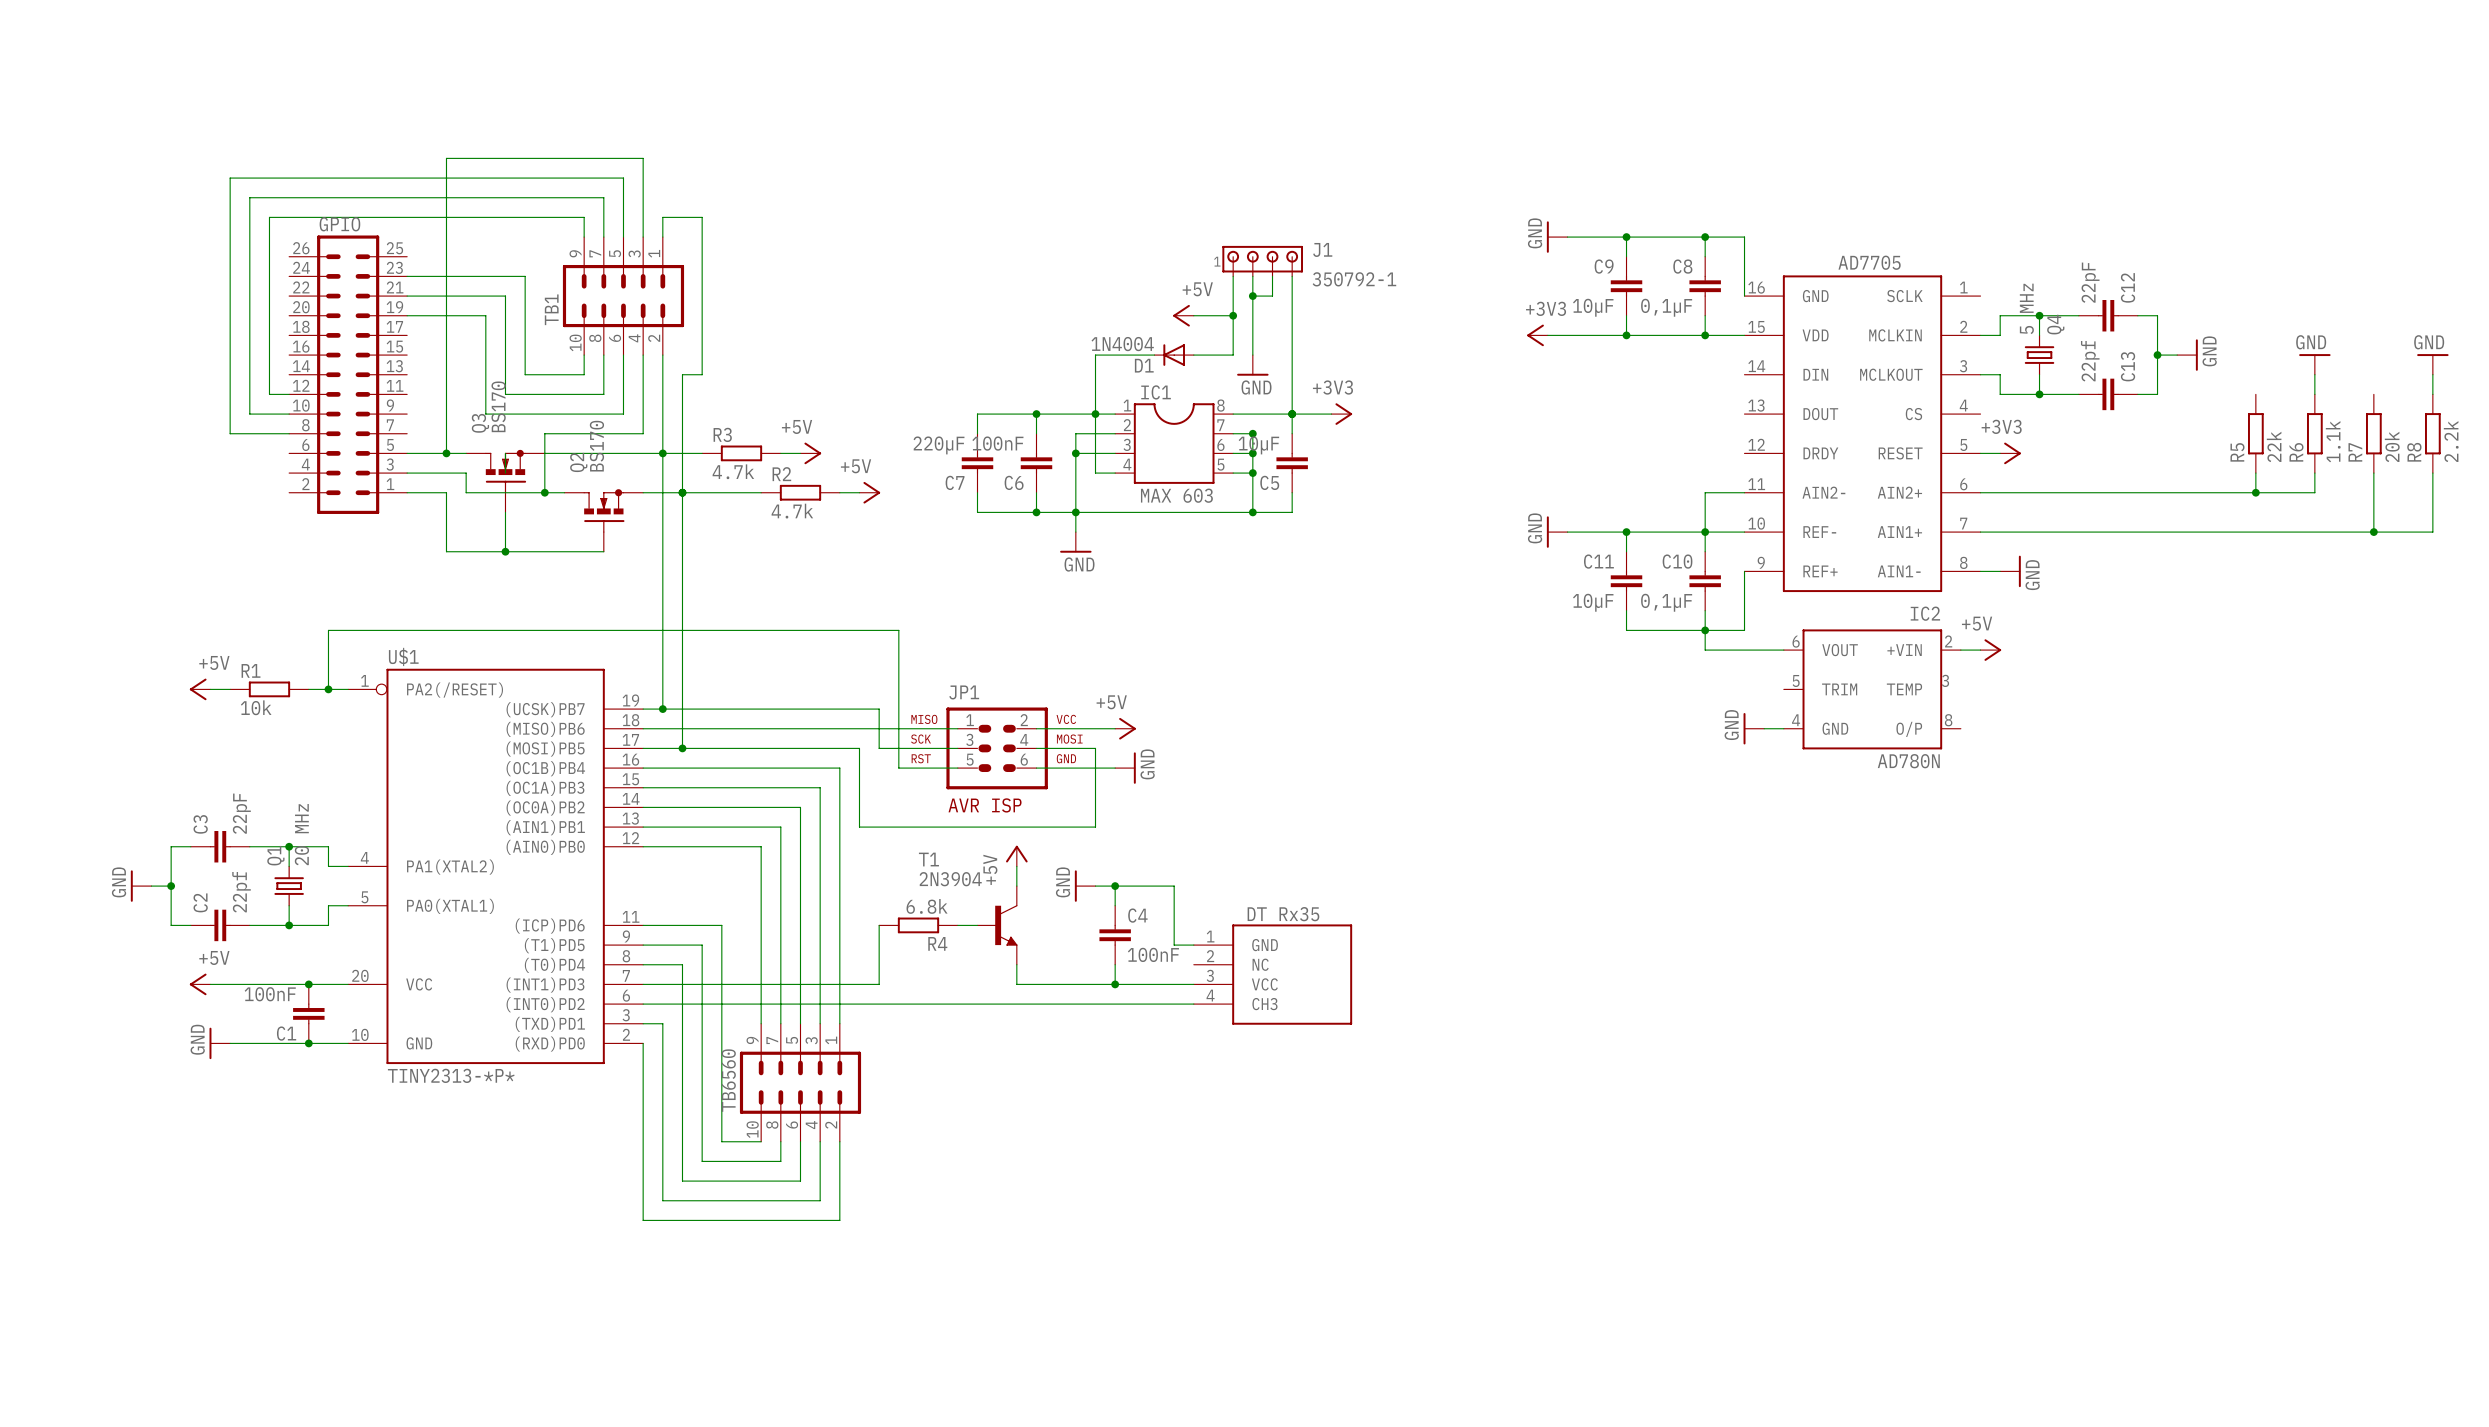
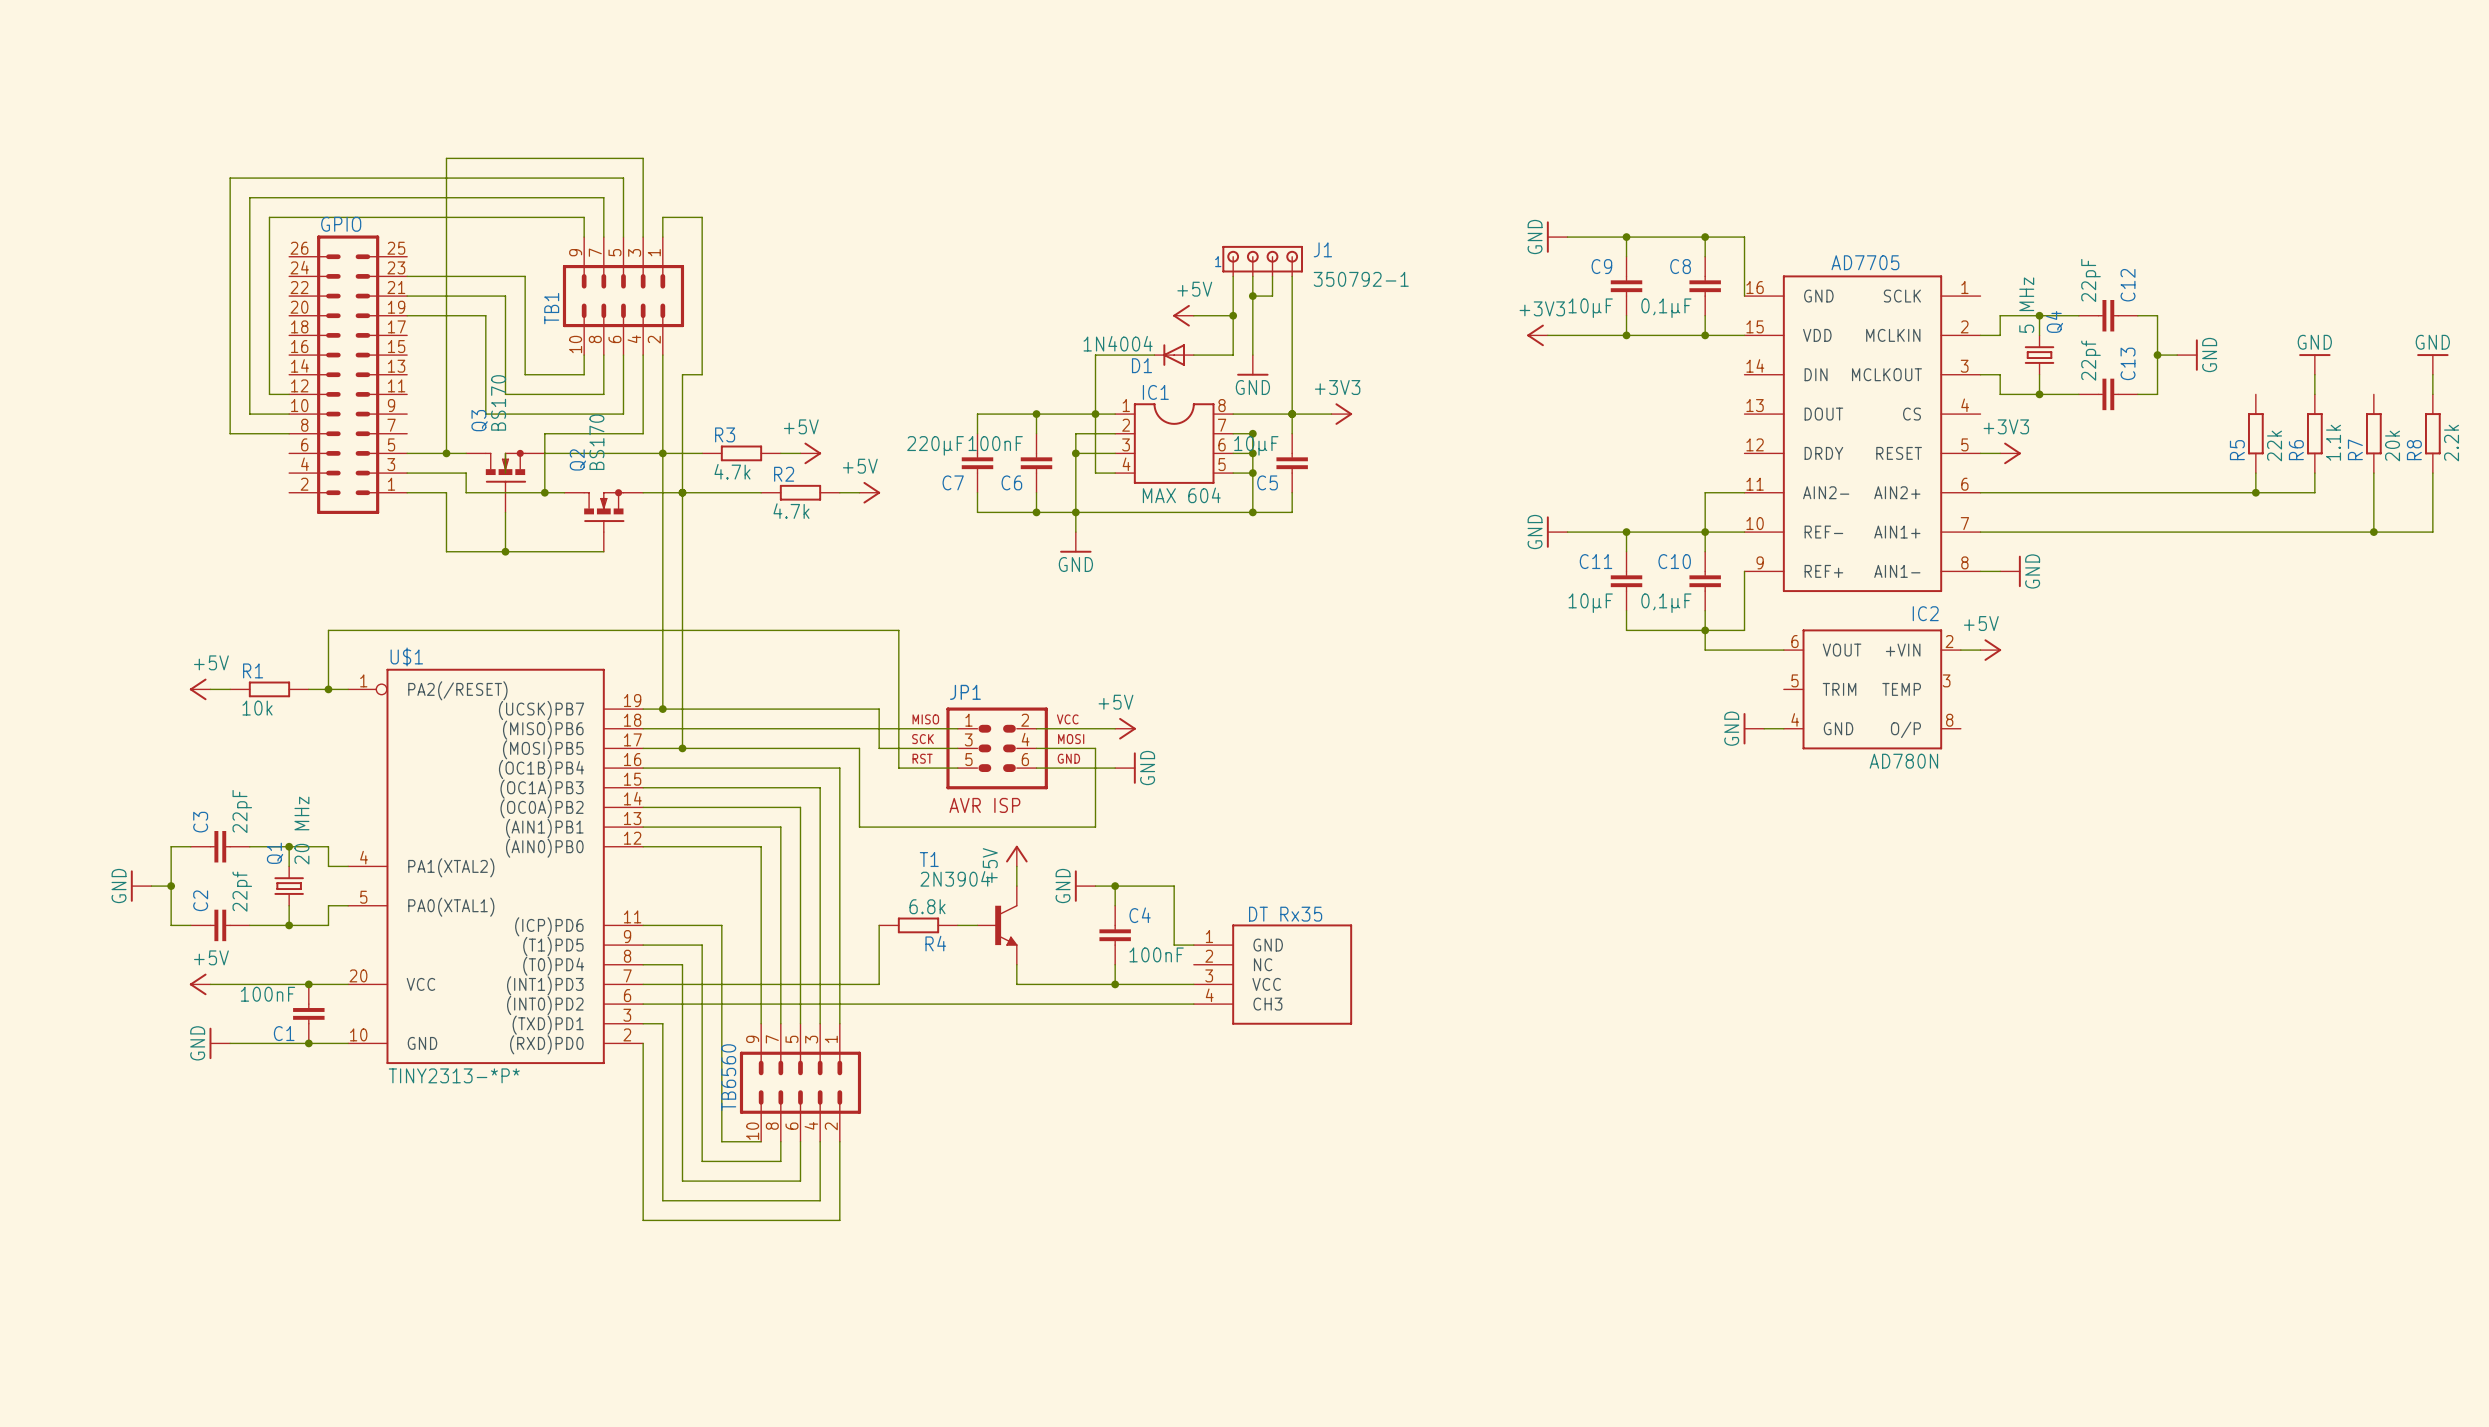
IC1 value: MAX 603 (1176, 495) -> MAX 604 (1181, 495)

